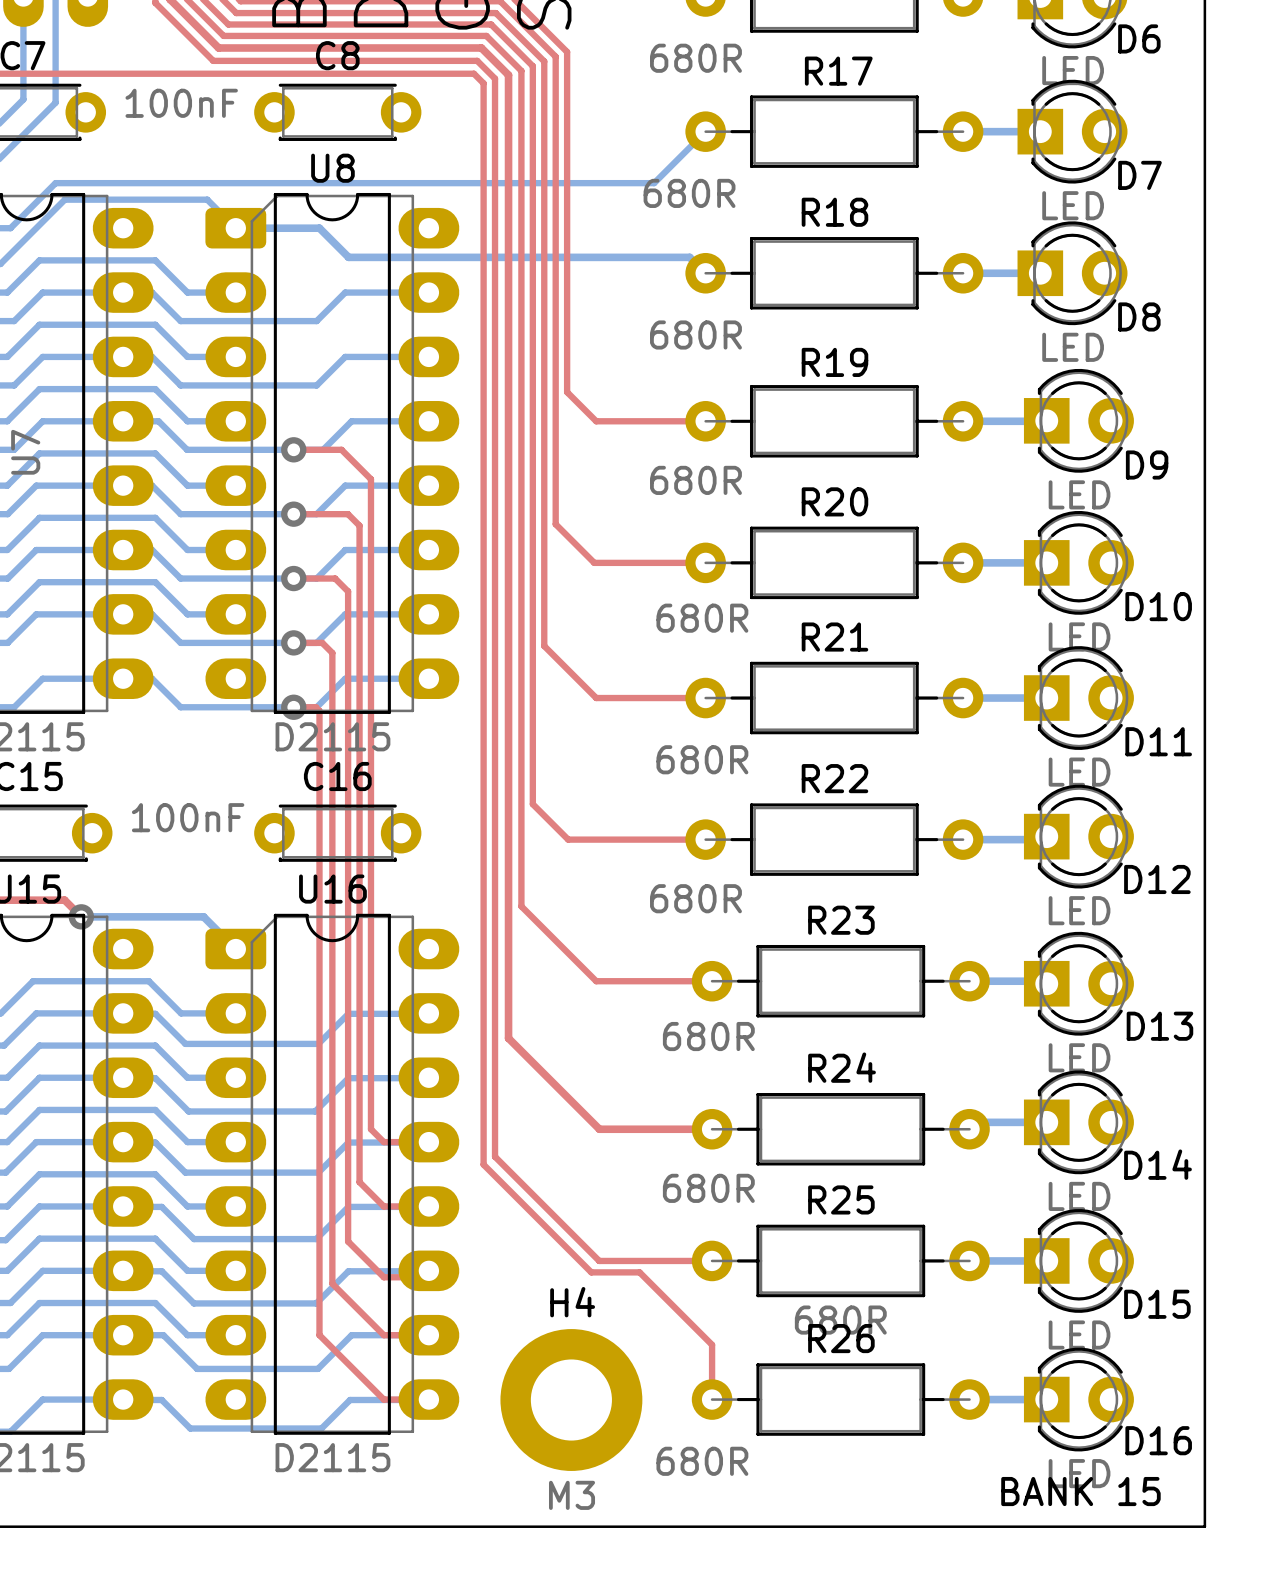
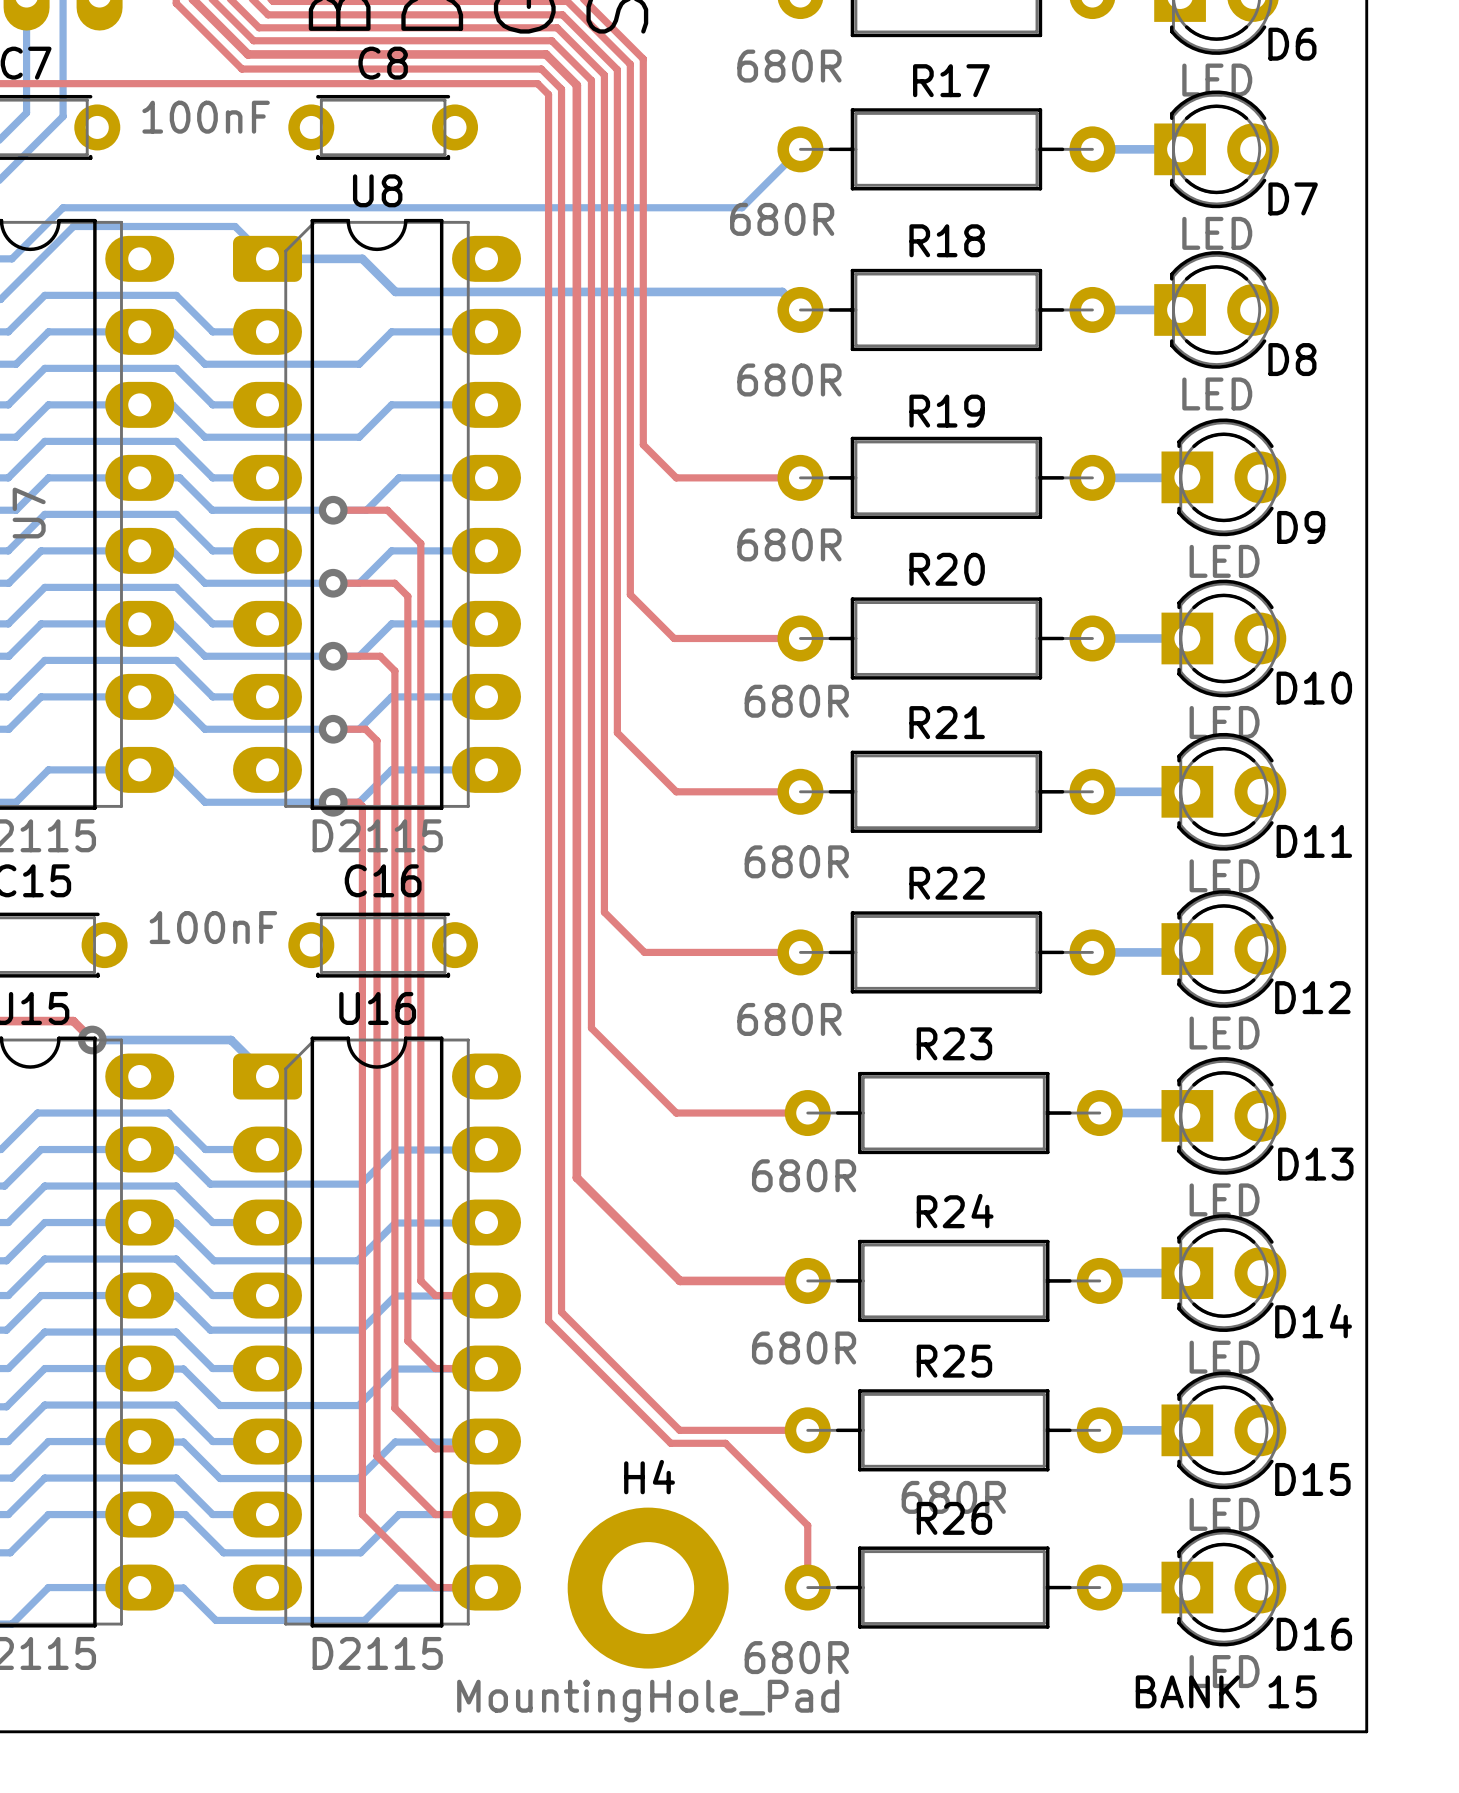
H4 value: M3 (572, 1495) -> MountingHole_Pad (648, 1701)

